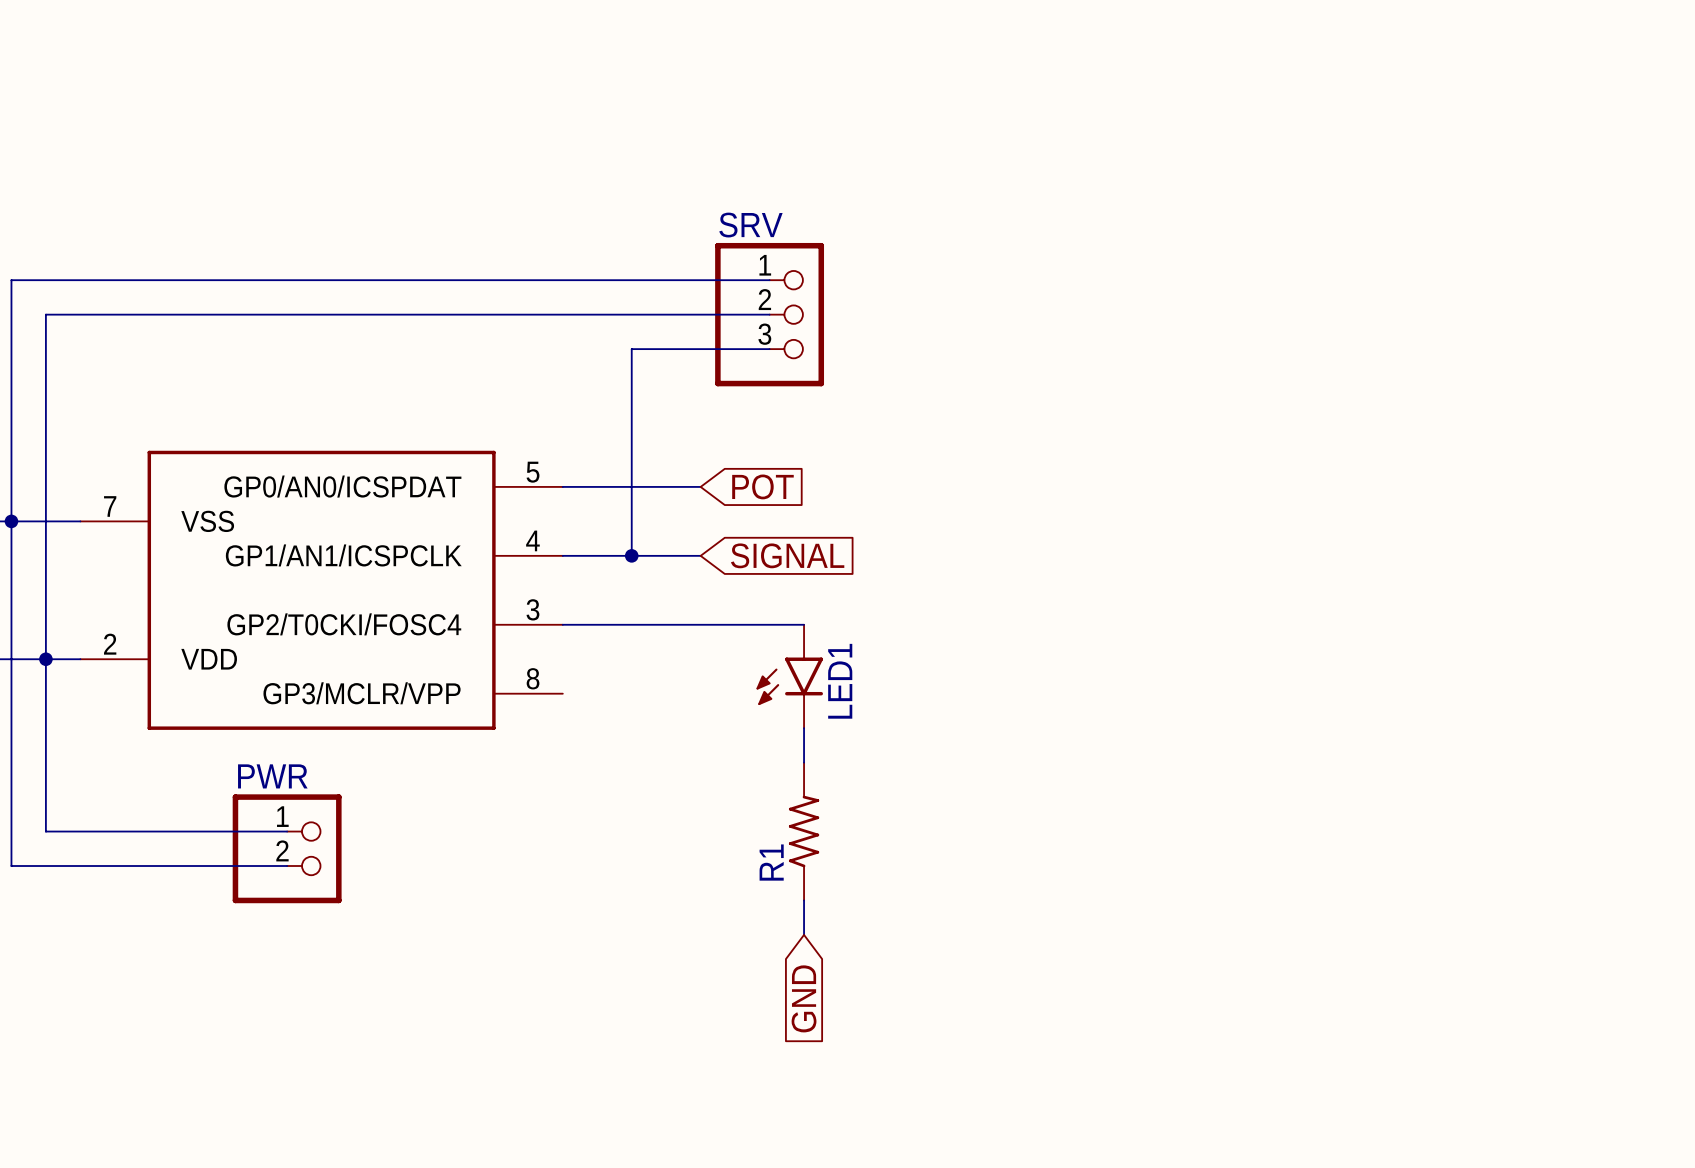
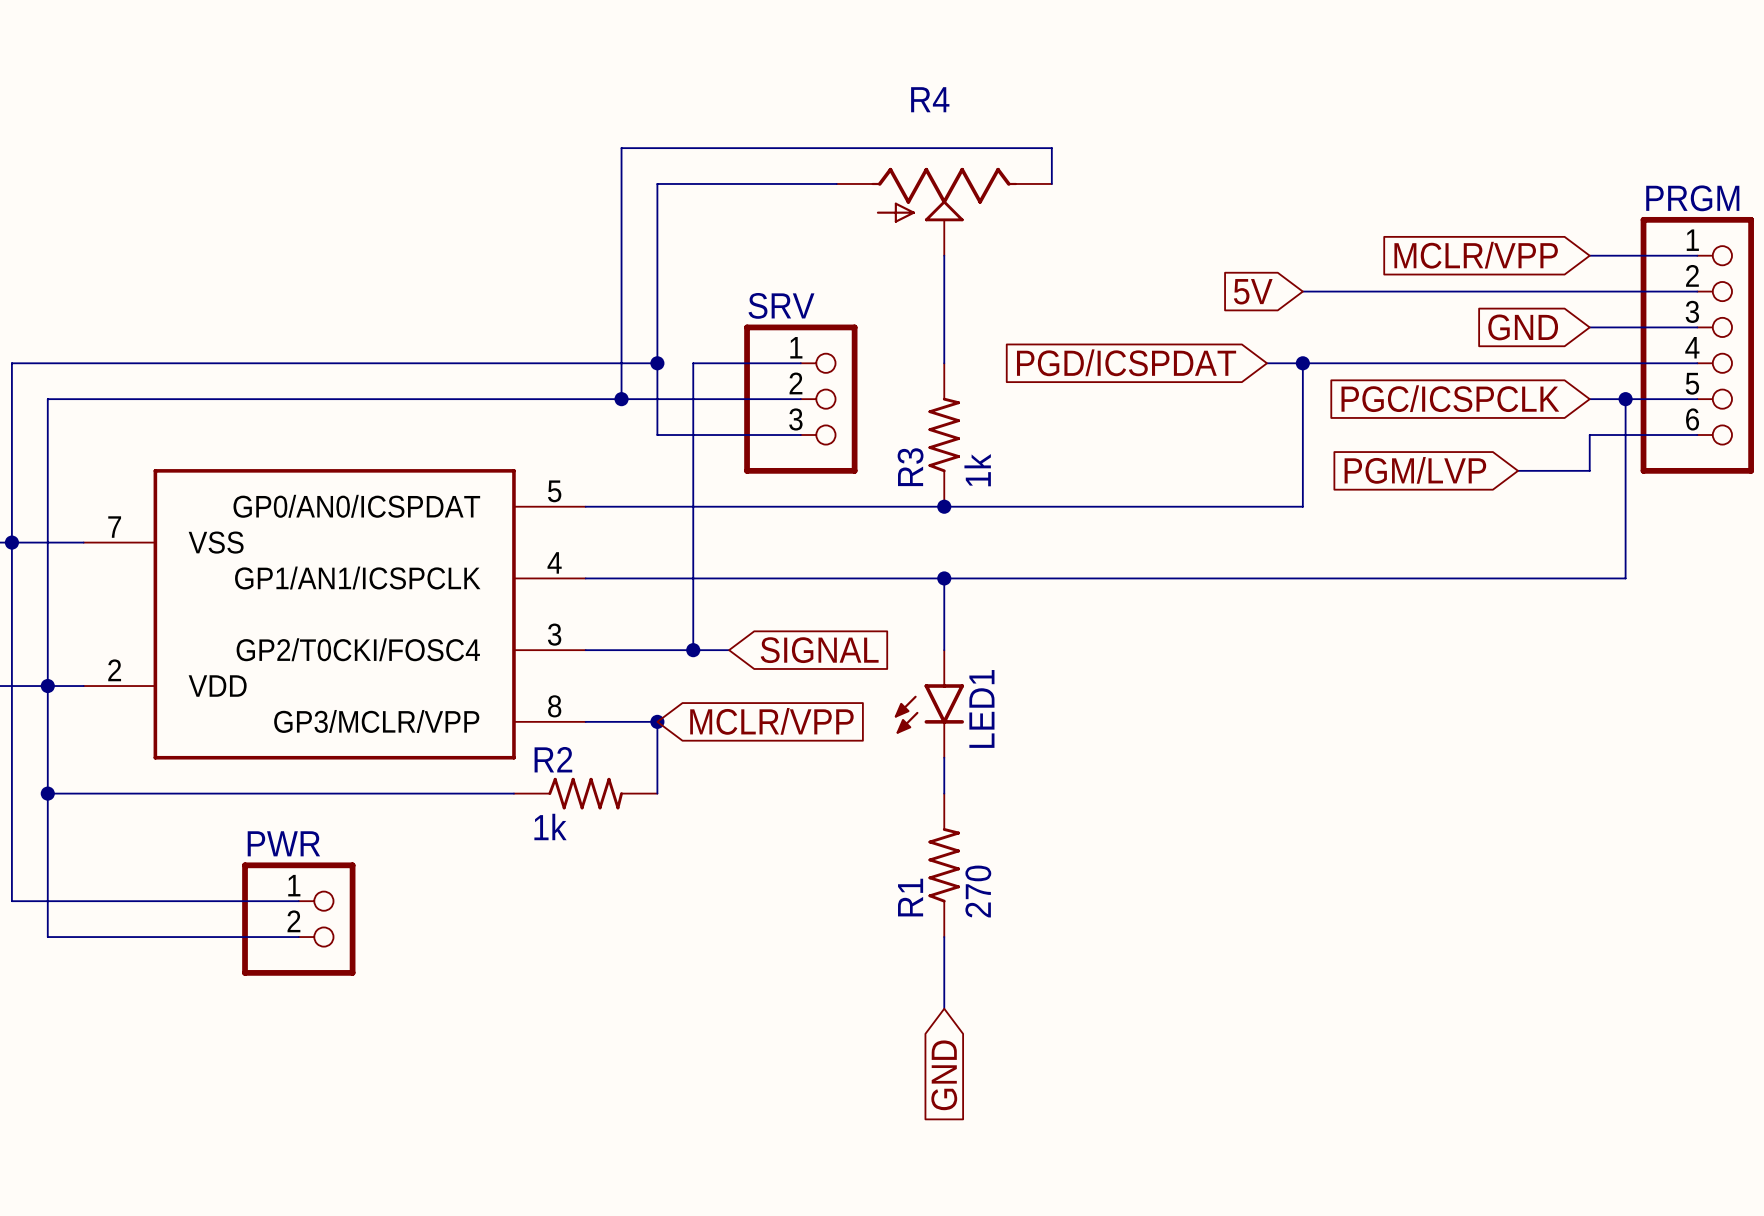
wire: none -> (1051, 183) (1051, 148) (621, 148) (621, 399)
R4: none -> (944, 211)
wire: none -> (944, 255) (944, 363)
global label: none -> MCLR/VPP (1476, 255)
wire: none -> (1589, 255) (1697, 255)
wire: (769, 280) (11, 280) (11, 349) -> (836, 183) (657, 183) (657, 363) (11, 363)
global label: none -> 5V (1253, 291)
wire: none -> (1302, 291) (1697, 291)
wire: (769, 314) (45, 314) (45, 383) -> (800, 399) (47, 399)
SRV position: (769, 314) -> (800, 399)
global label: none -> GND (1523, 327)
wire: none -> (1589, 327) (1697, 327)
PRGM: none -> (1697, 345)
global label: none -> PGD/ICSPDAT (1126, 362)
wire: (631, 349) (666, 349) -> (693, 650) (693, 363)
junction: none -> (657, 363)
wire: none -> (1267, 363) (1697, 363)
wire: none -> (1302, 363) (1302, 506) (729, 506)
junction: none -> (1302, 363)
junction: none -> (621, 399)
global label: none -> PGC/ICSPCLK (1450, 398)
wire: none -> (1589, 399) (1697, 399)
wire: none -> (1625, 399) (1625, 578) (729, 578)
junction: none -> (1625, 399)
wire: (631, 418) (631, 555) -> (657, 435) (800, 435)
R3: none -> 1k (944, 435)
wire: none -> (1697, 435) (1589, 435) (1589, 470) (1518, 470)
global label: none -> PGM/LVP (1415, 470)
global label: POT (762, 486) -> none
junction: none -> (944, 506)
junction: (631, 555) -> none
global label position: SIGNAL (787, 555) -> SIGNAL (819, 650)
wire: none -> (944, 578) (944, 650)
junction: none -> (944, 578)
junction: none -> (693, 650)
wire: (700, 624) (804, 624) -> none
LED1 position: (789, 676) -> (929, 703)
wire: none -> (585, 721) (657, 721) (657, 793)
junction: none -> (657, 721)
global label: none -> MCLR/VPP (771, 721)
wire: (804, 728) (804, 762) -> (944, 757) (944, 793)
wire: none -> (47, 793) (513, 793)
junction: none -> (47, 793)
R2: none -> 1k (585, 793)
wire: (45, 831) (287, 831) -> (47, 865) (47, 937) (298, 937)
R1 position: (804, 831) -> (944, 865)
PWR position: (287, 848) -> (298, 919)
R1 value: none -> 270 (978, 891)
wire: (804, 900) (804, 934) -> none
wire: none -> (944, 937) (944, 1008)
global label position: GND (804, 998) -> GND (944, 1075)

